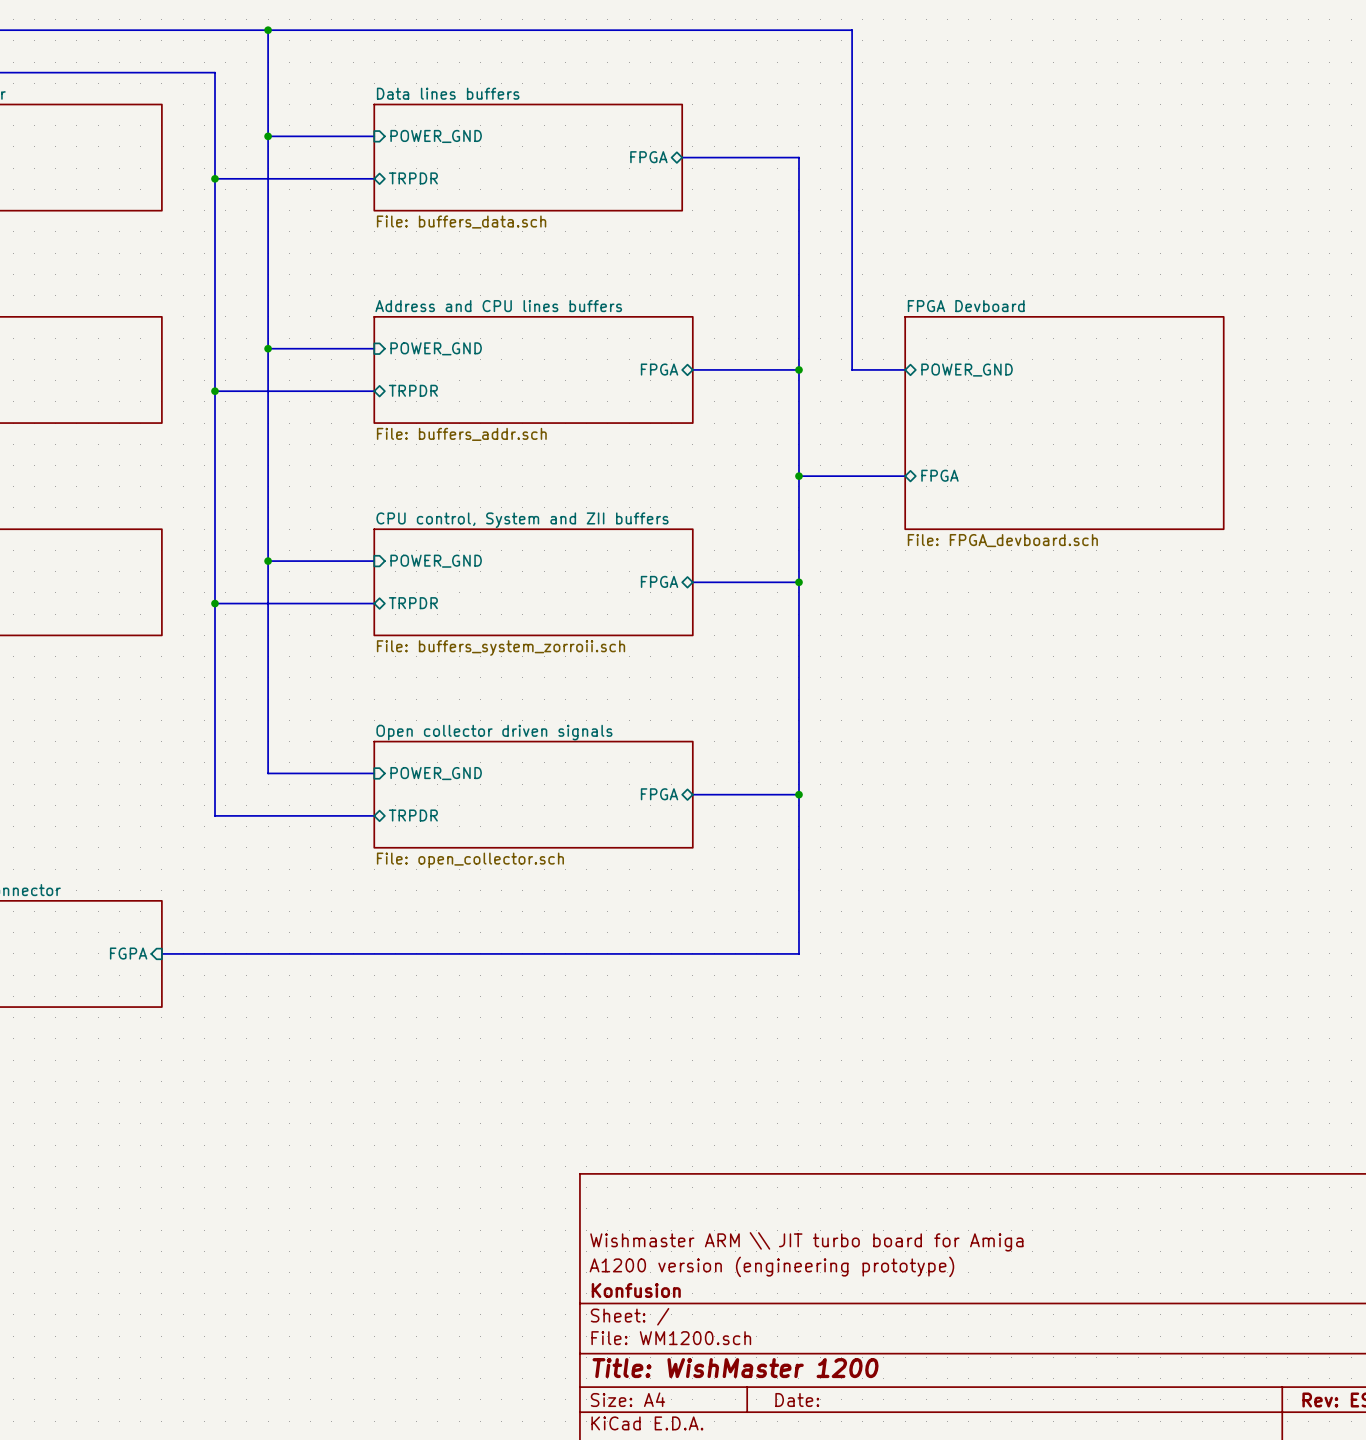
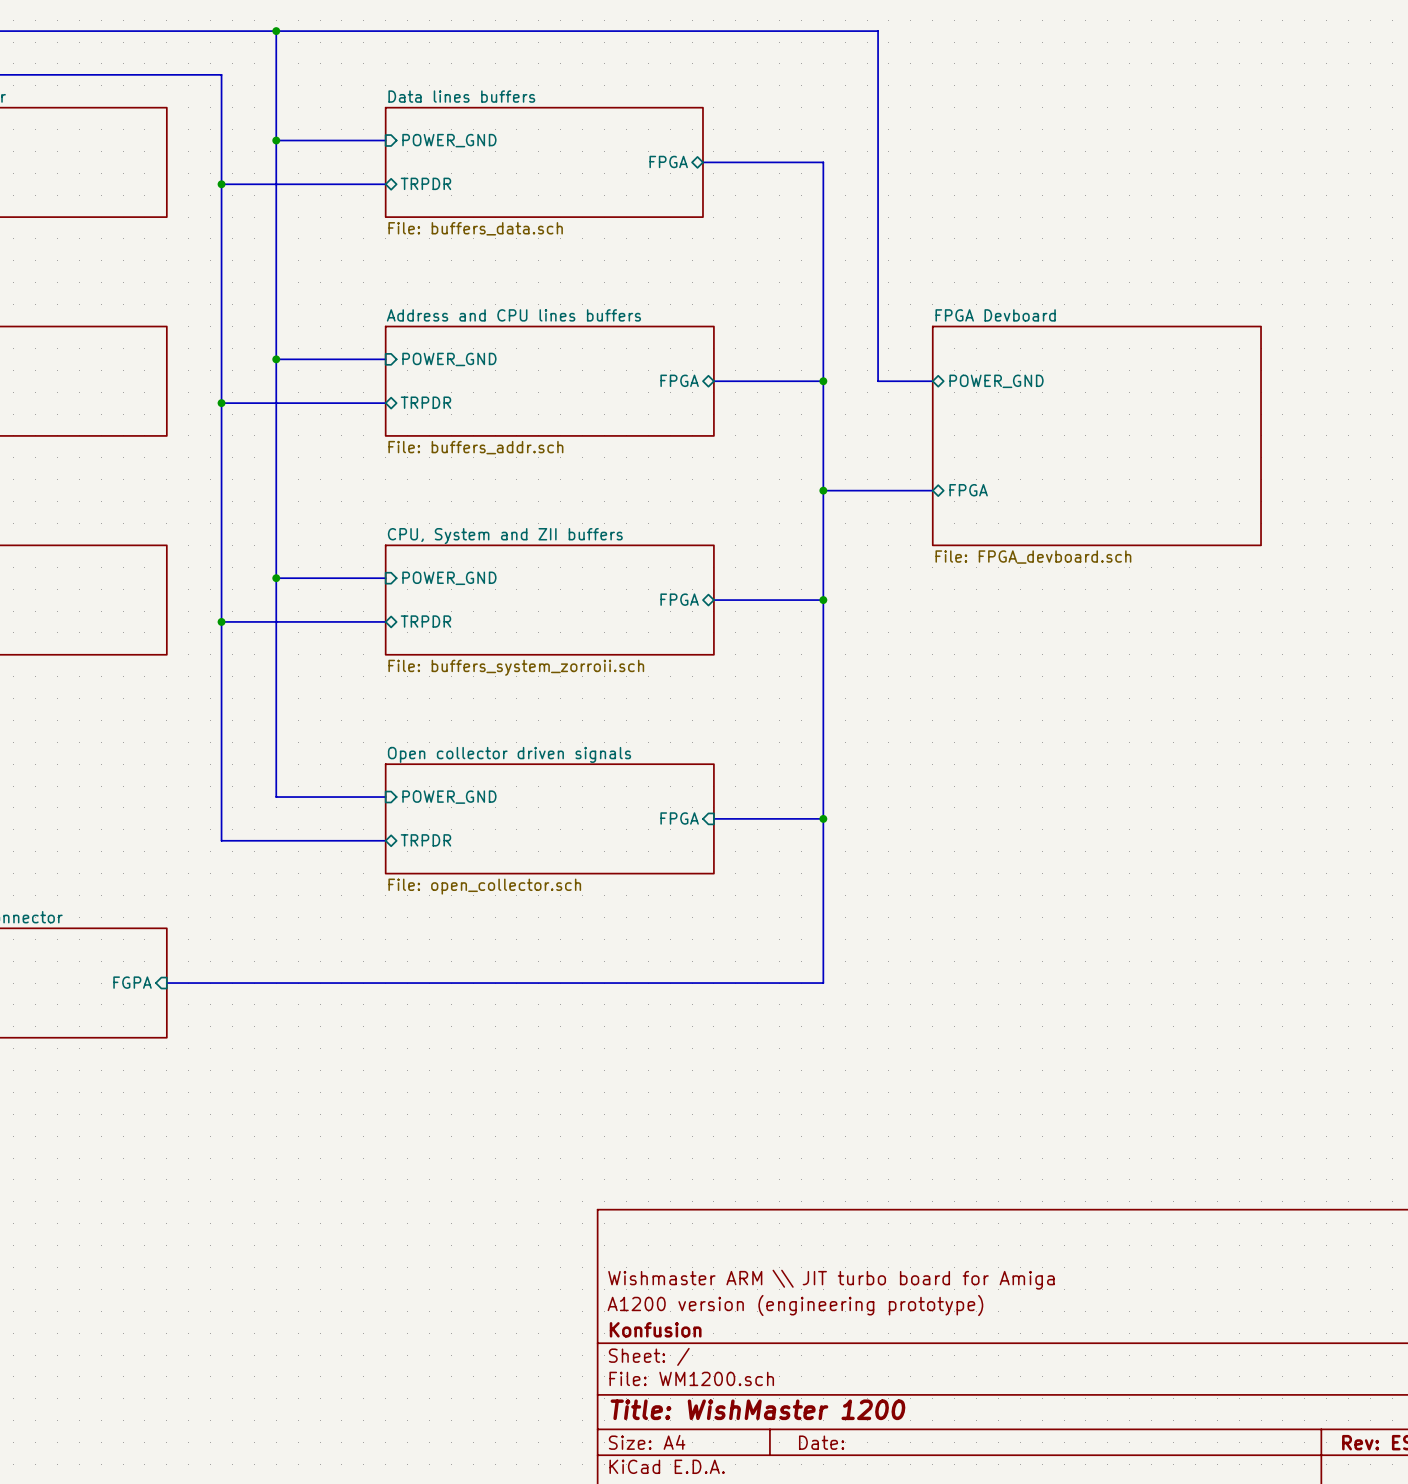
sheet CPU control, System and ZII buffers name: CPU control, System and ZII buffers (522, 520) -> CPU, System and ZII buffers (505, 536)
sheet pin shape: bidirectional (659, 794) -> input (679, 818)

